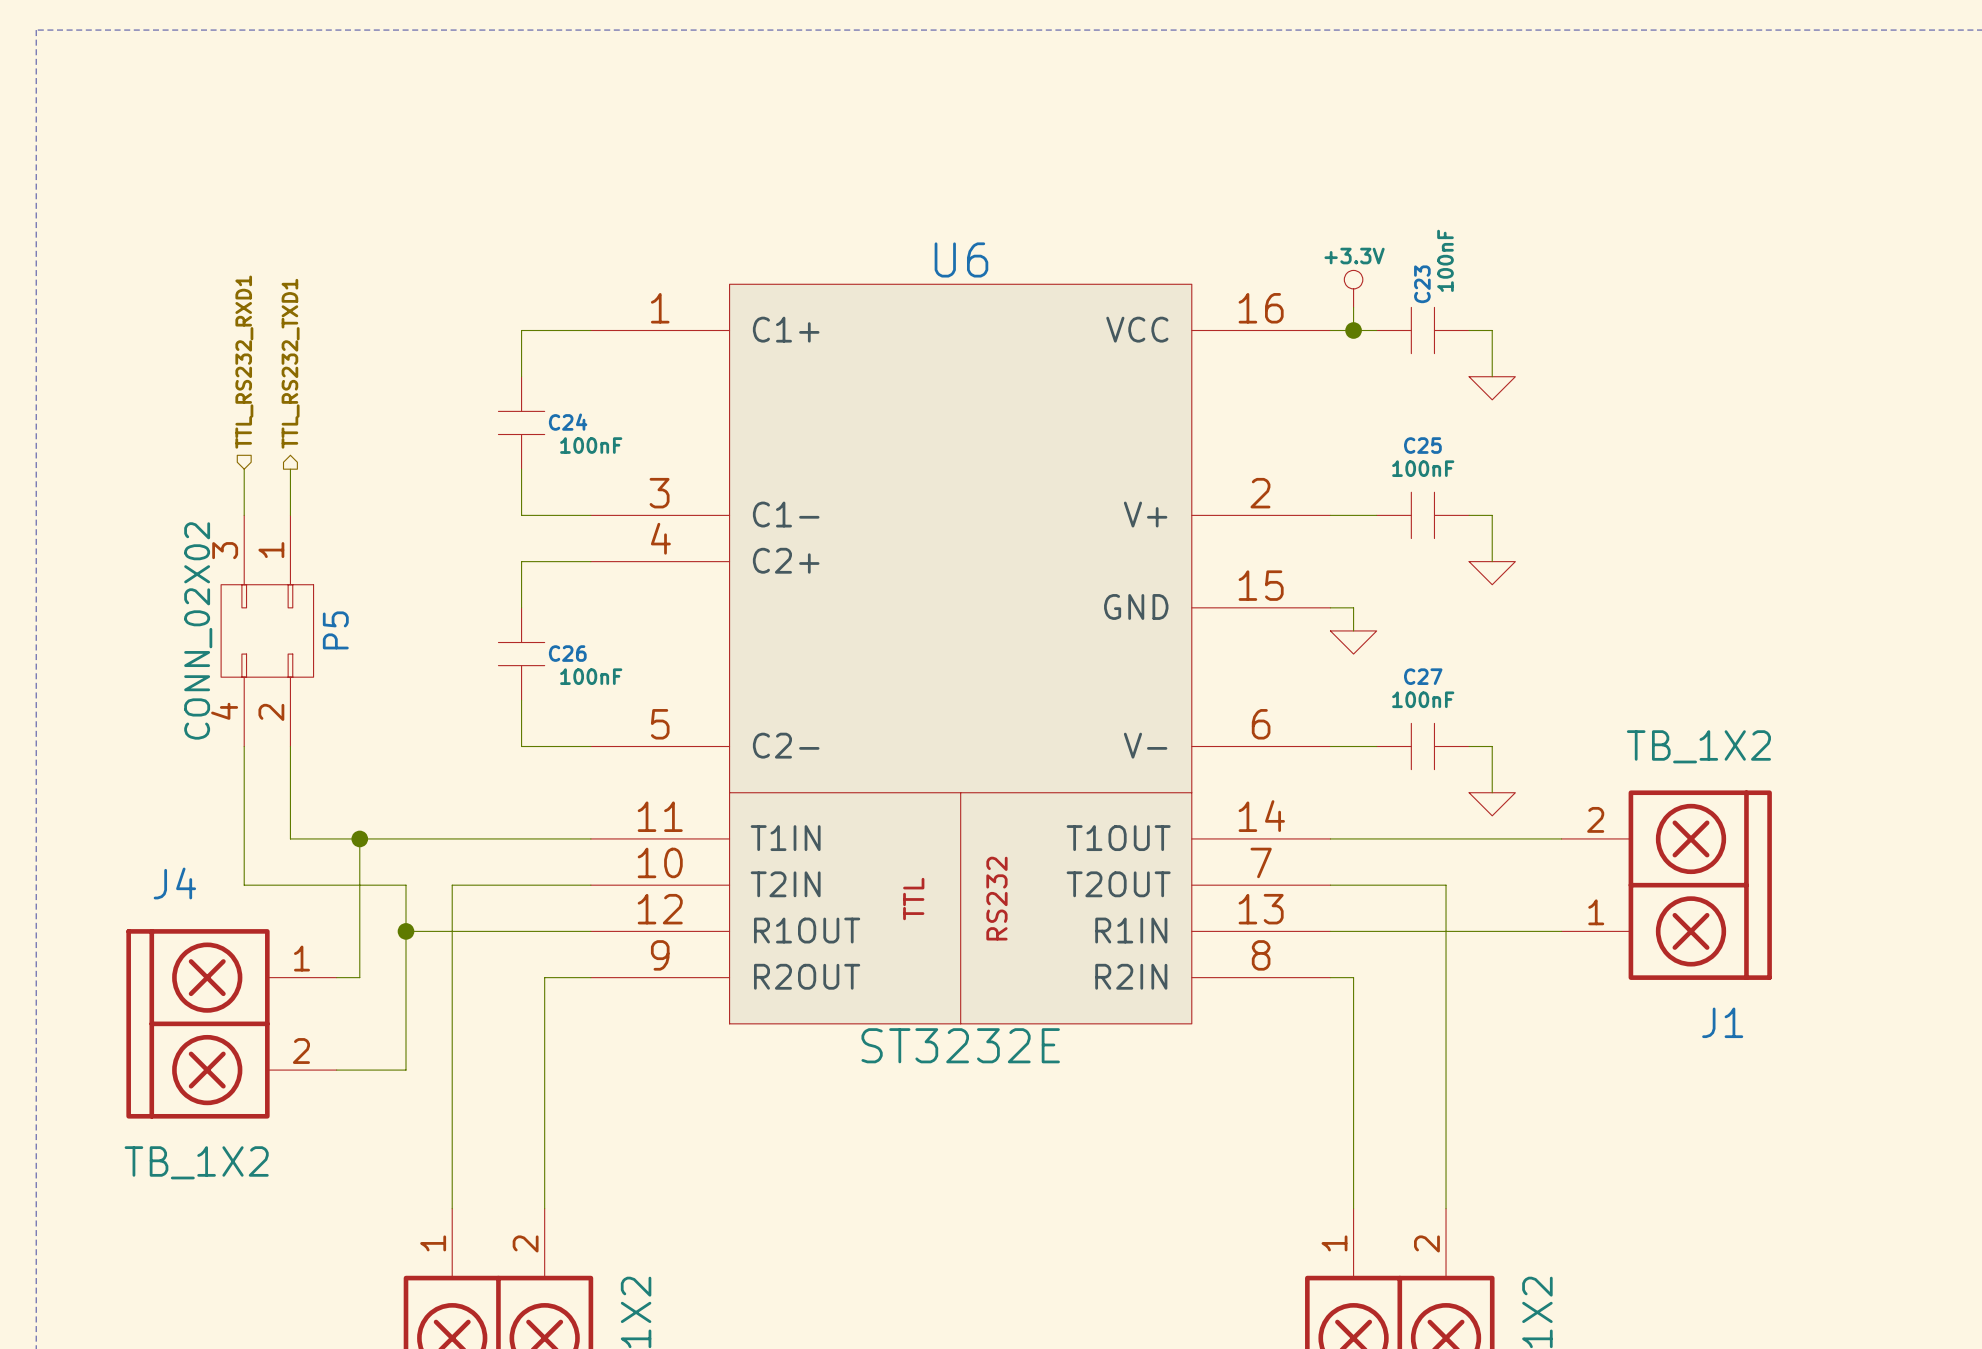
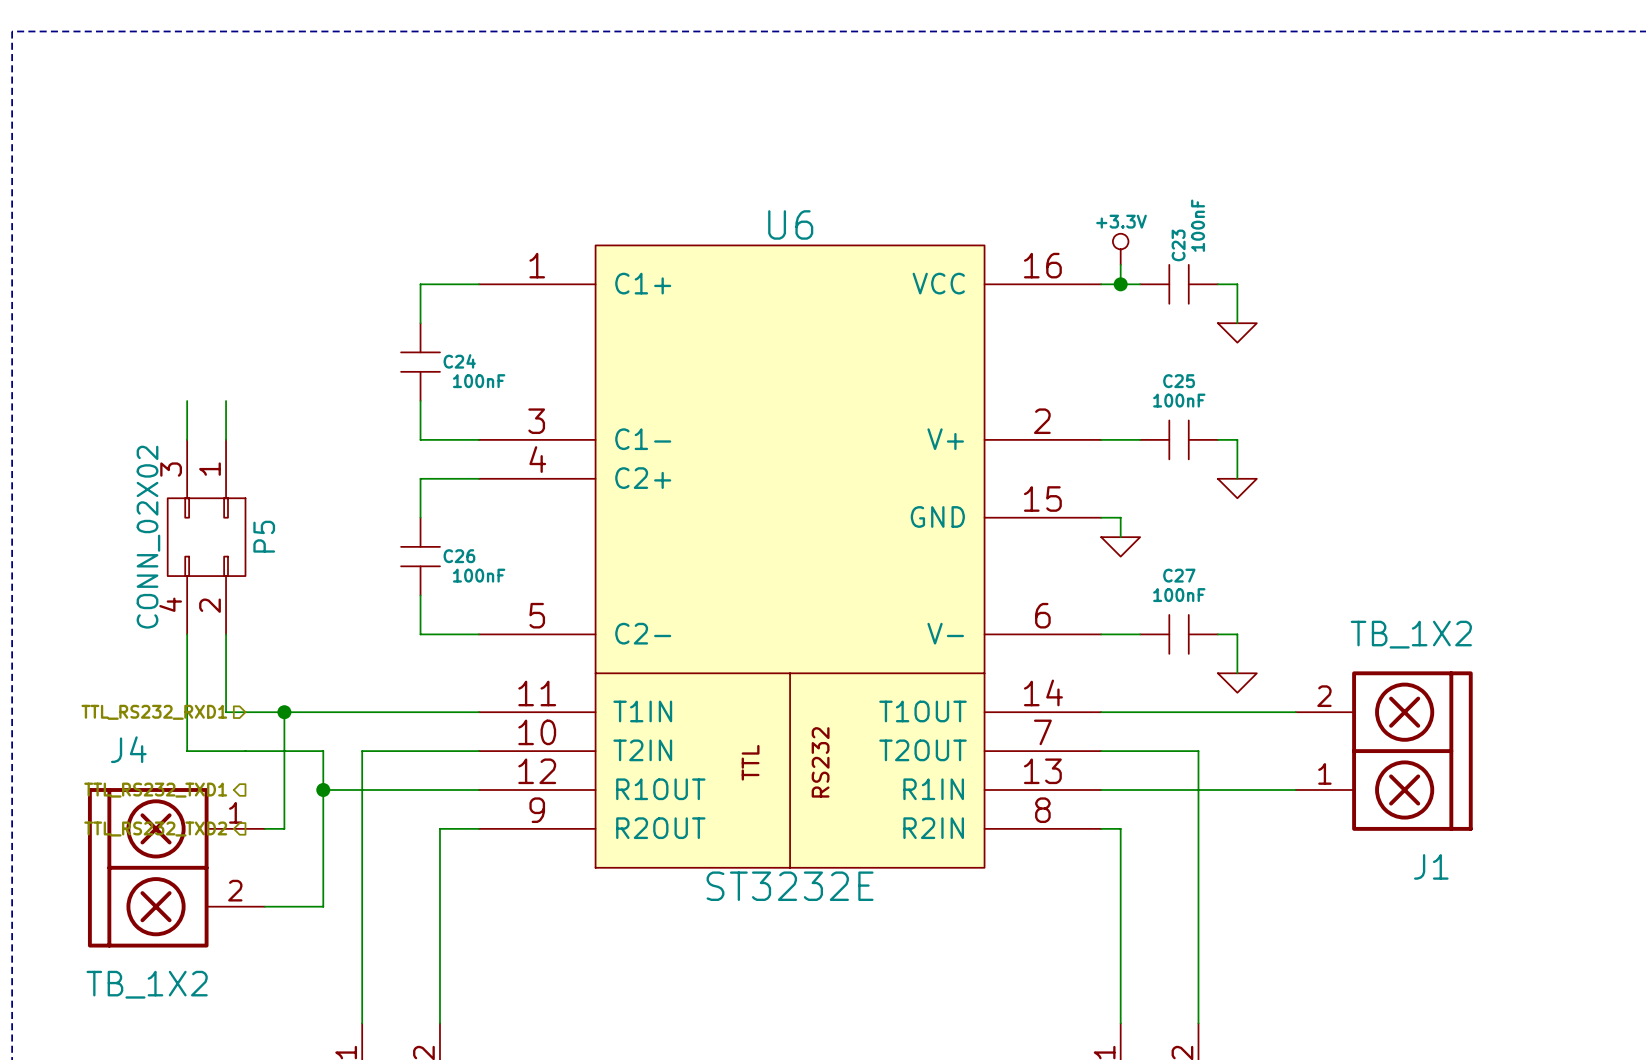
hierarchical label rotation: 0° (244, 362) -> 90° counterclockwise (154, 712)
hierarchical label position: TTL_RS232_RXD1 (244, 362) -> TTL_RS232_RXD1 (154, 712)
hierarchical label: TTL_RS232_TXD1 (290, 363) -> none
hierarchical label: none -> TTL_RS232_TXD1 (155, 790)
hierarchical label: none -> TTL_RS232_TXD2 (155, 829)

